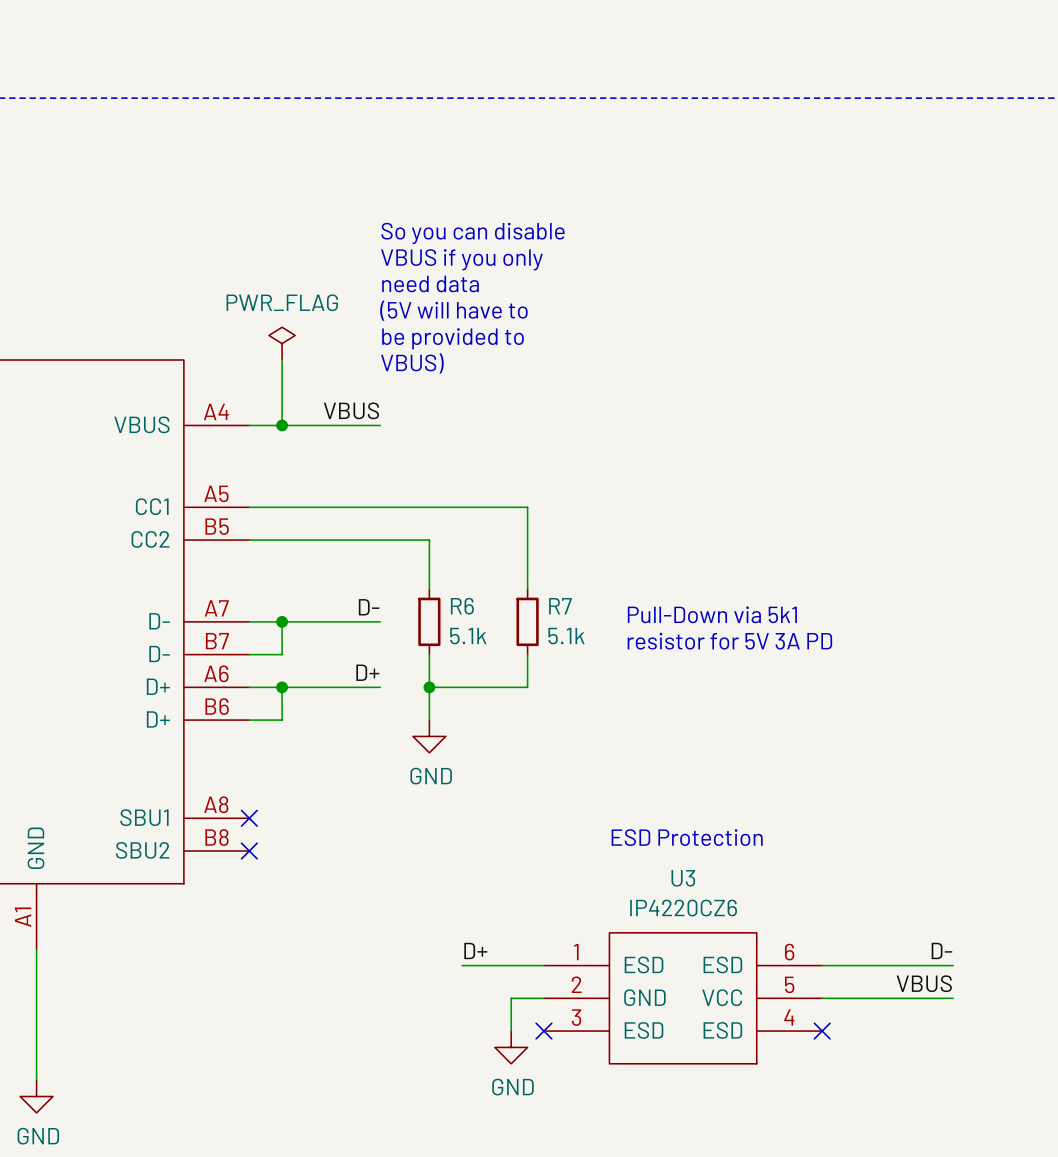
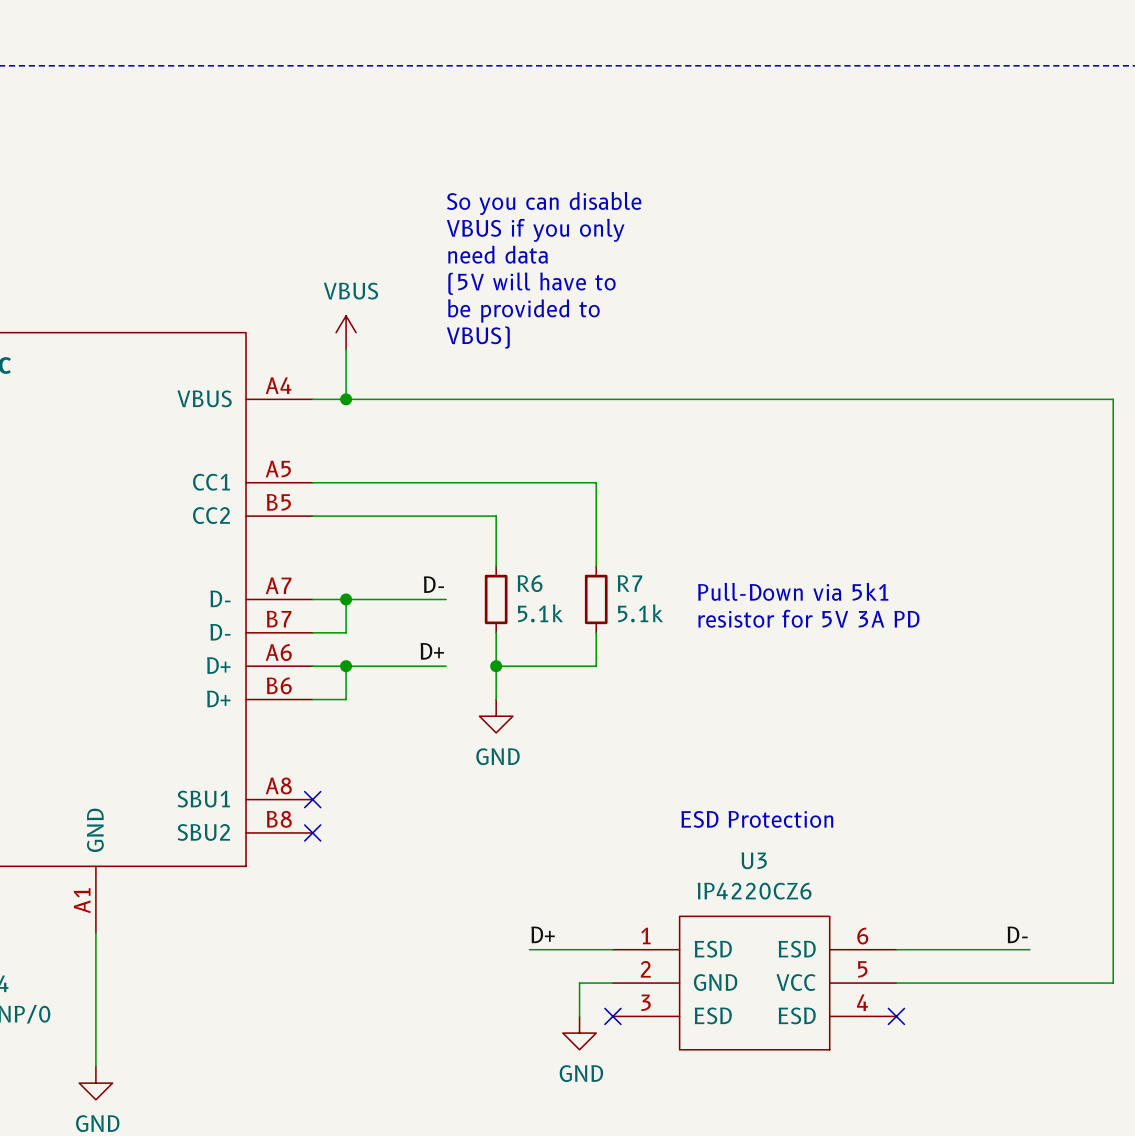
power symbol: PWR_FLAG (282, 343) -> none
power symbol: none -> VBUS (346, 332)
label: VBUS (351, 410) -> none
wire: none -> (446, 399) (1113, 399) (1113, 983) (1029, 983)
label: VBUS (924, 983) -> none

